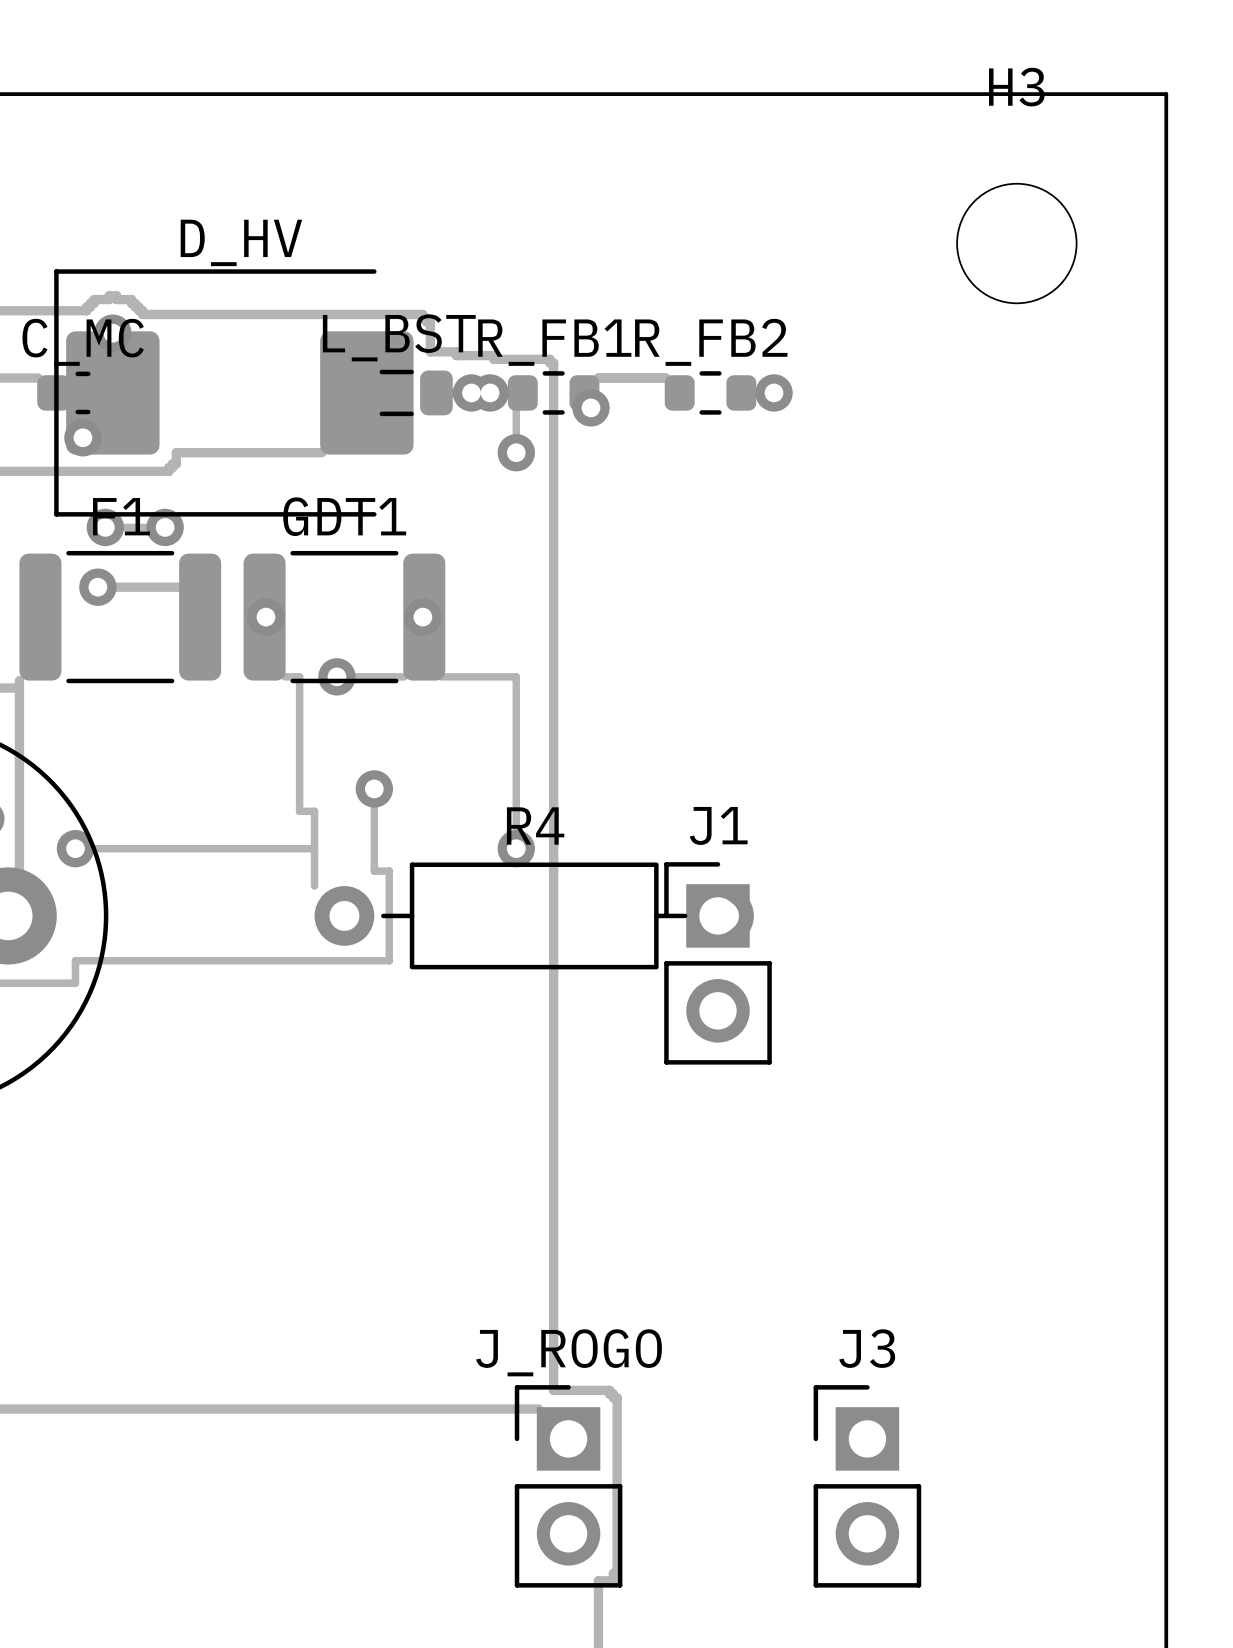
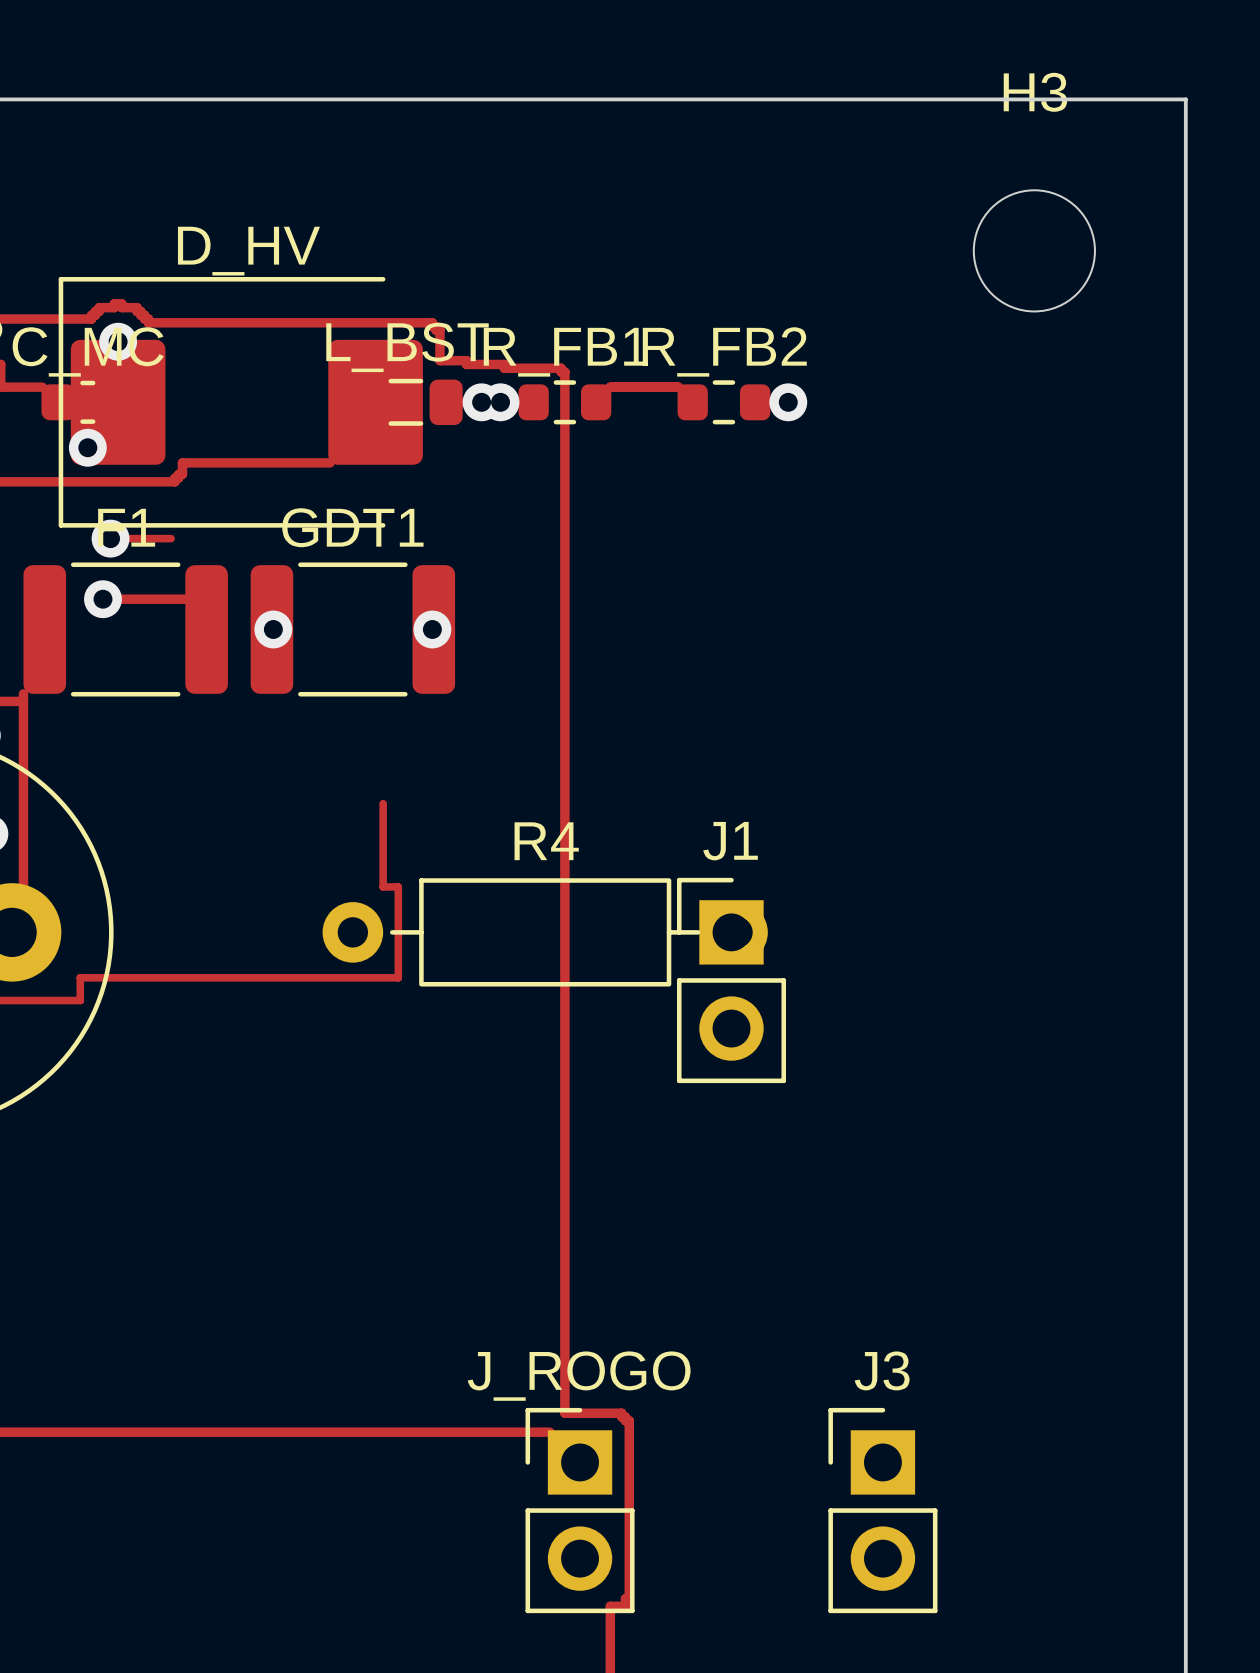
track: (516, 407) (516, 452) -> none
via: (590, 407) -> none
via: (516, 452) -> none
via: (165, 527) -> none
track: (284, 676) (299, 676) (299, 811) (314, 811) (314, 886) -> none
track: (336, 676) (404, 676) -> none
via: (336, 676) -> none
track: (441, 676) (516, 676) (516, 848) -> none
via: (374, 788) -> none
track: (75, 848) (314, 848) -> none
via: (75, 848) -> none
via: (516, 848) -> none

